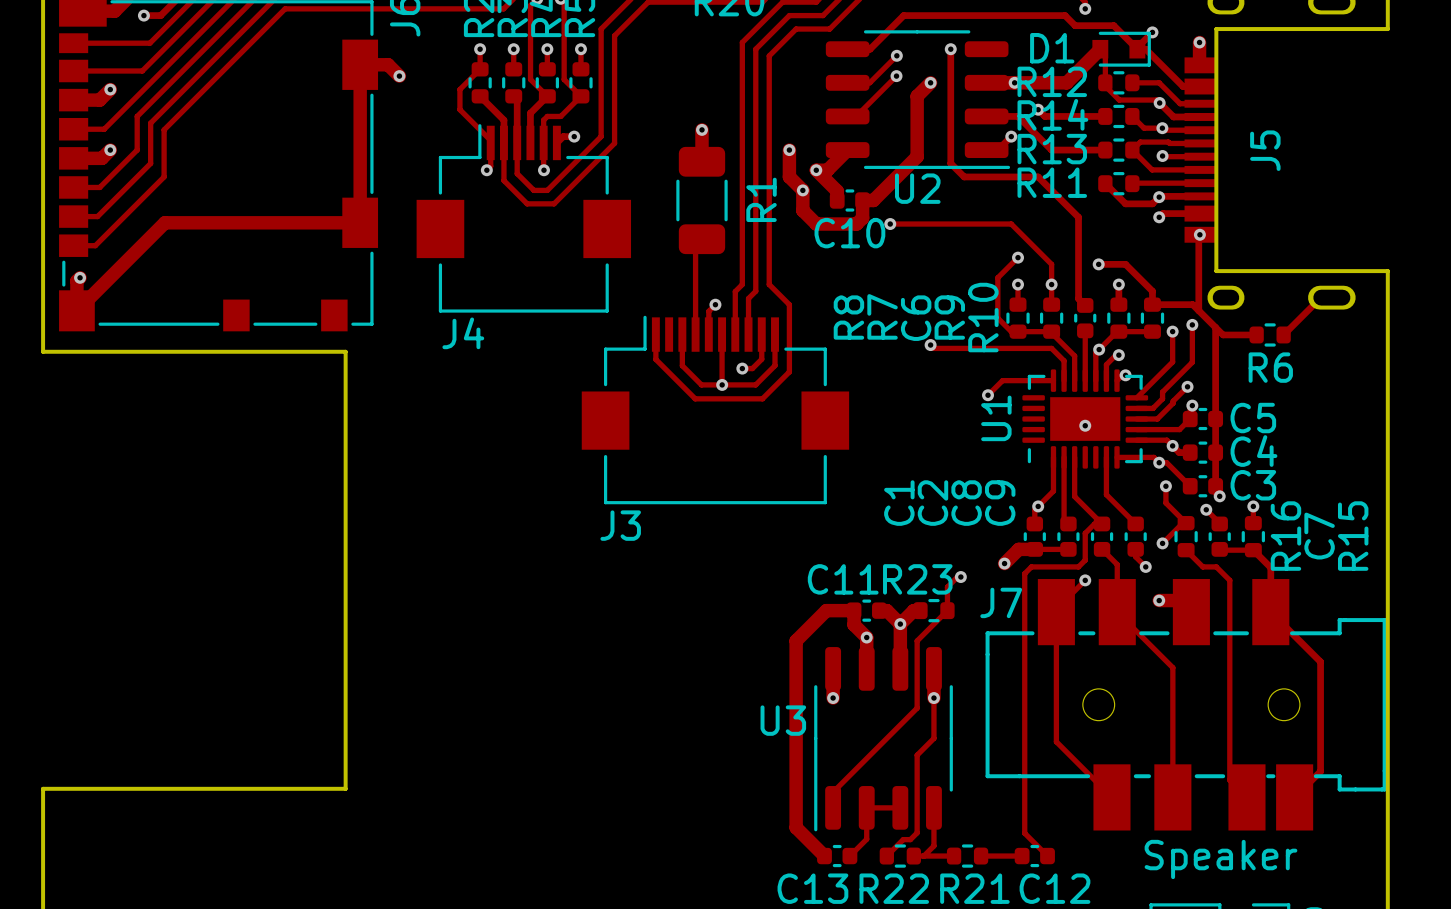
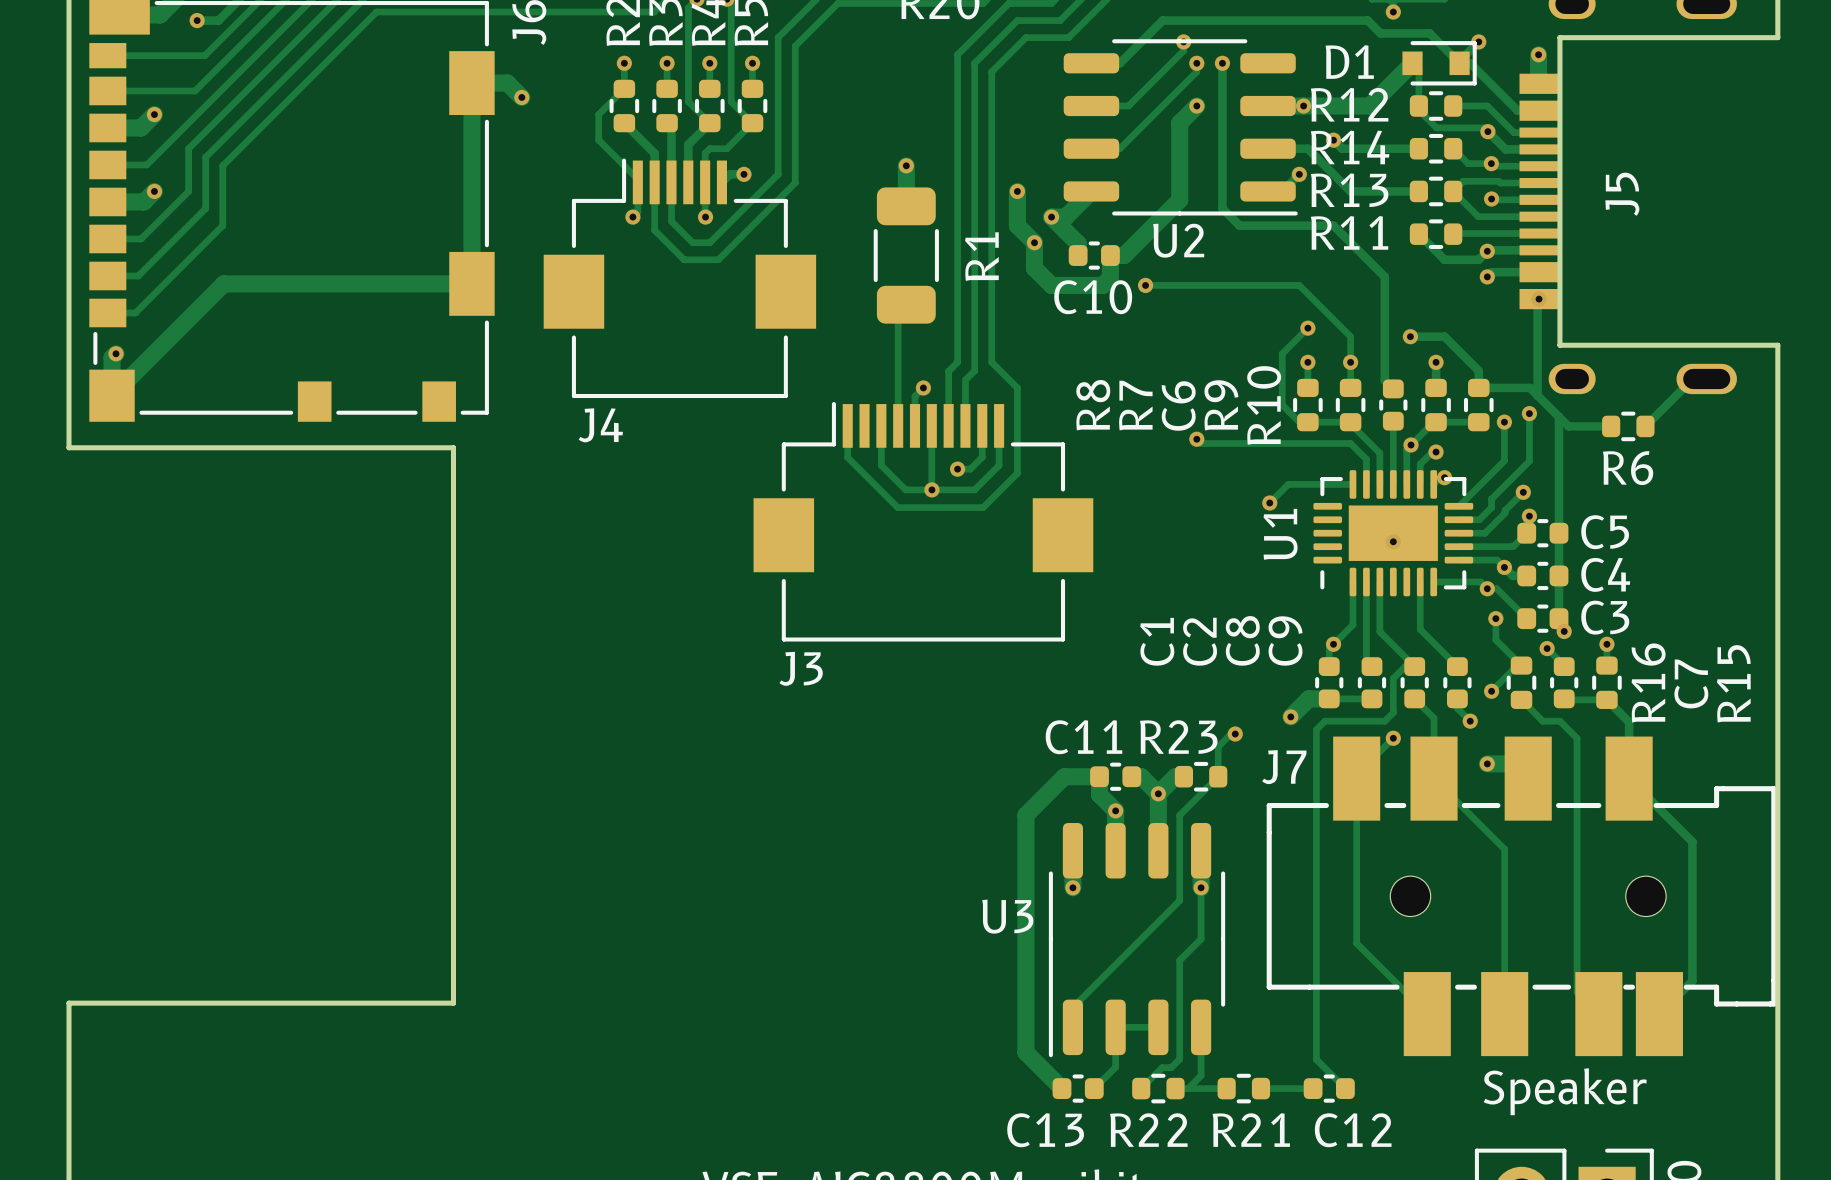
via: none -> (1183, 41)
via: none -> (1196, 63)
track: (896, 55) (869, 82) -> (1183, 41) (1183, 50) (1128, 106) (1119, 106)
via: (896, 55) -> none
track: (896, 76) (856, 116) -> (1196, 63) (1196, 71) (1119, 148) (1102, 148)
via: (896, 76) -> none

